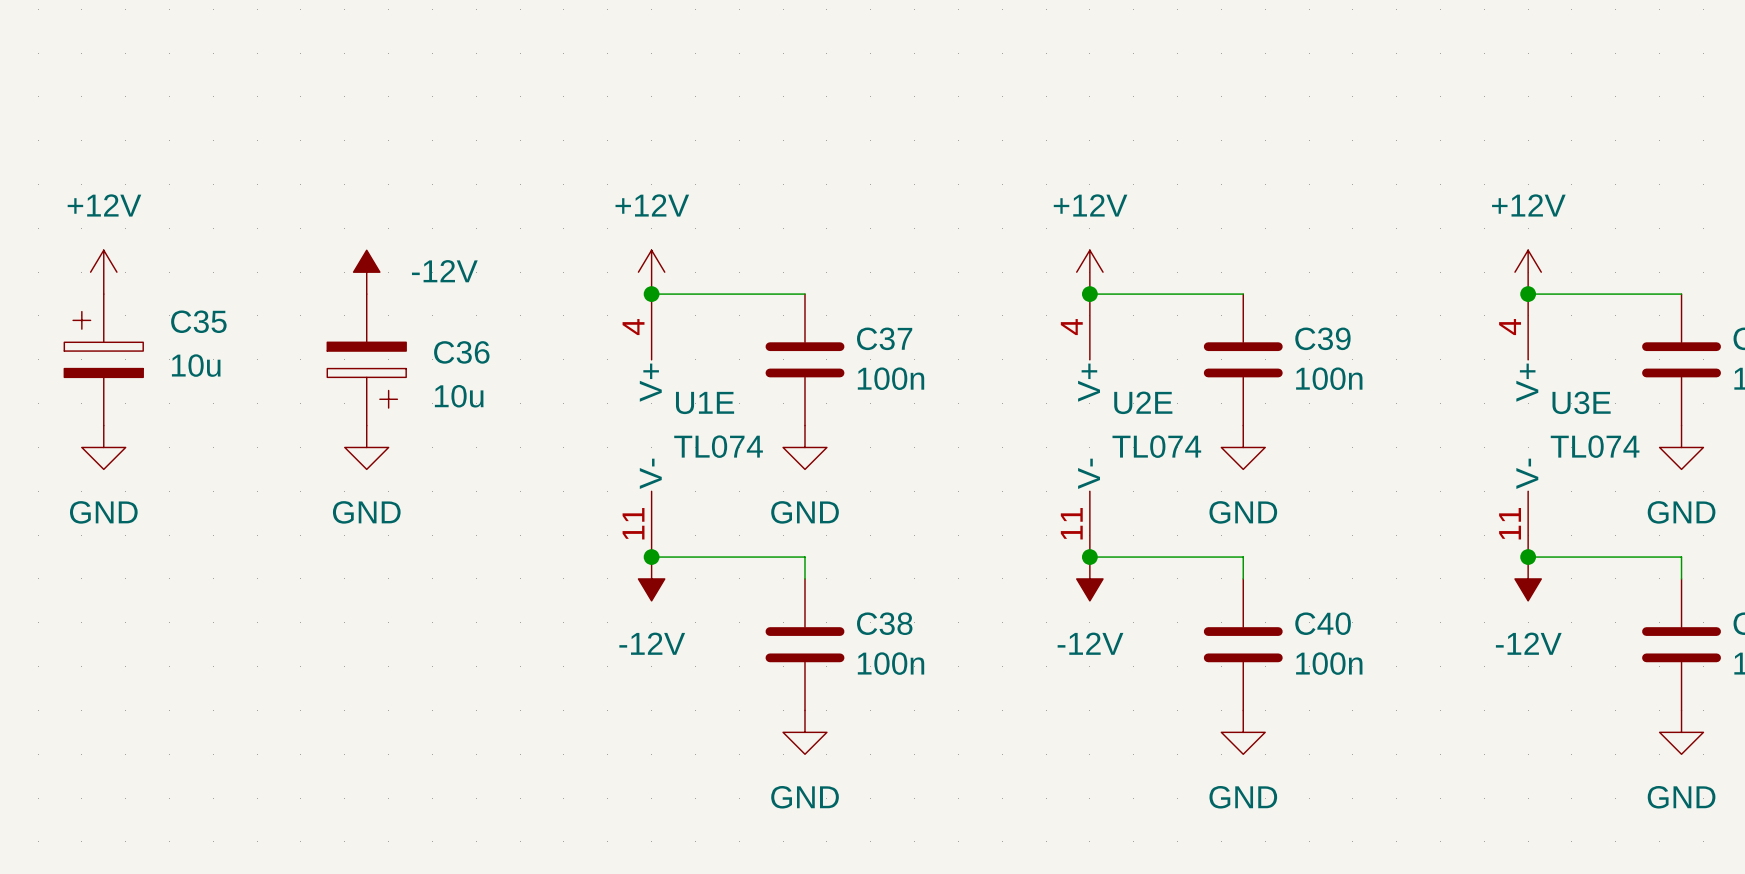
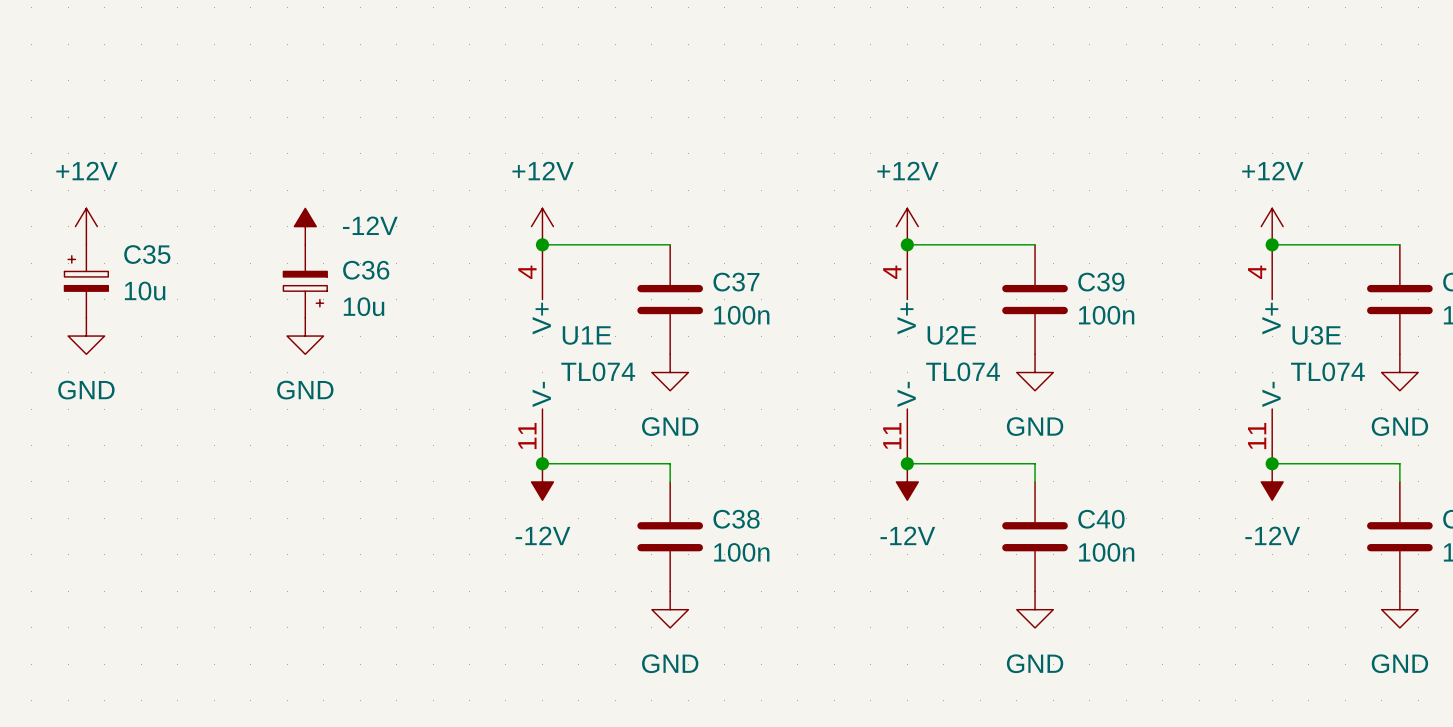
C35 symbol: [64, 294, 144, 426] -> [64, 244, 109, 318]
C36 symbol: [327, 294, 407, 426] -> [283, 244, 328, 318]
power symbol position: GND (103, 447) -> GND (86, 336)
power symbol position: GND (366, 447) -> GND (305, 336)

